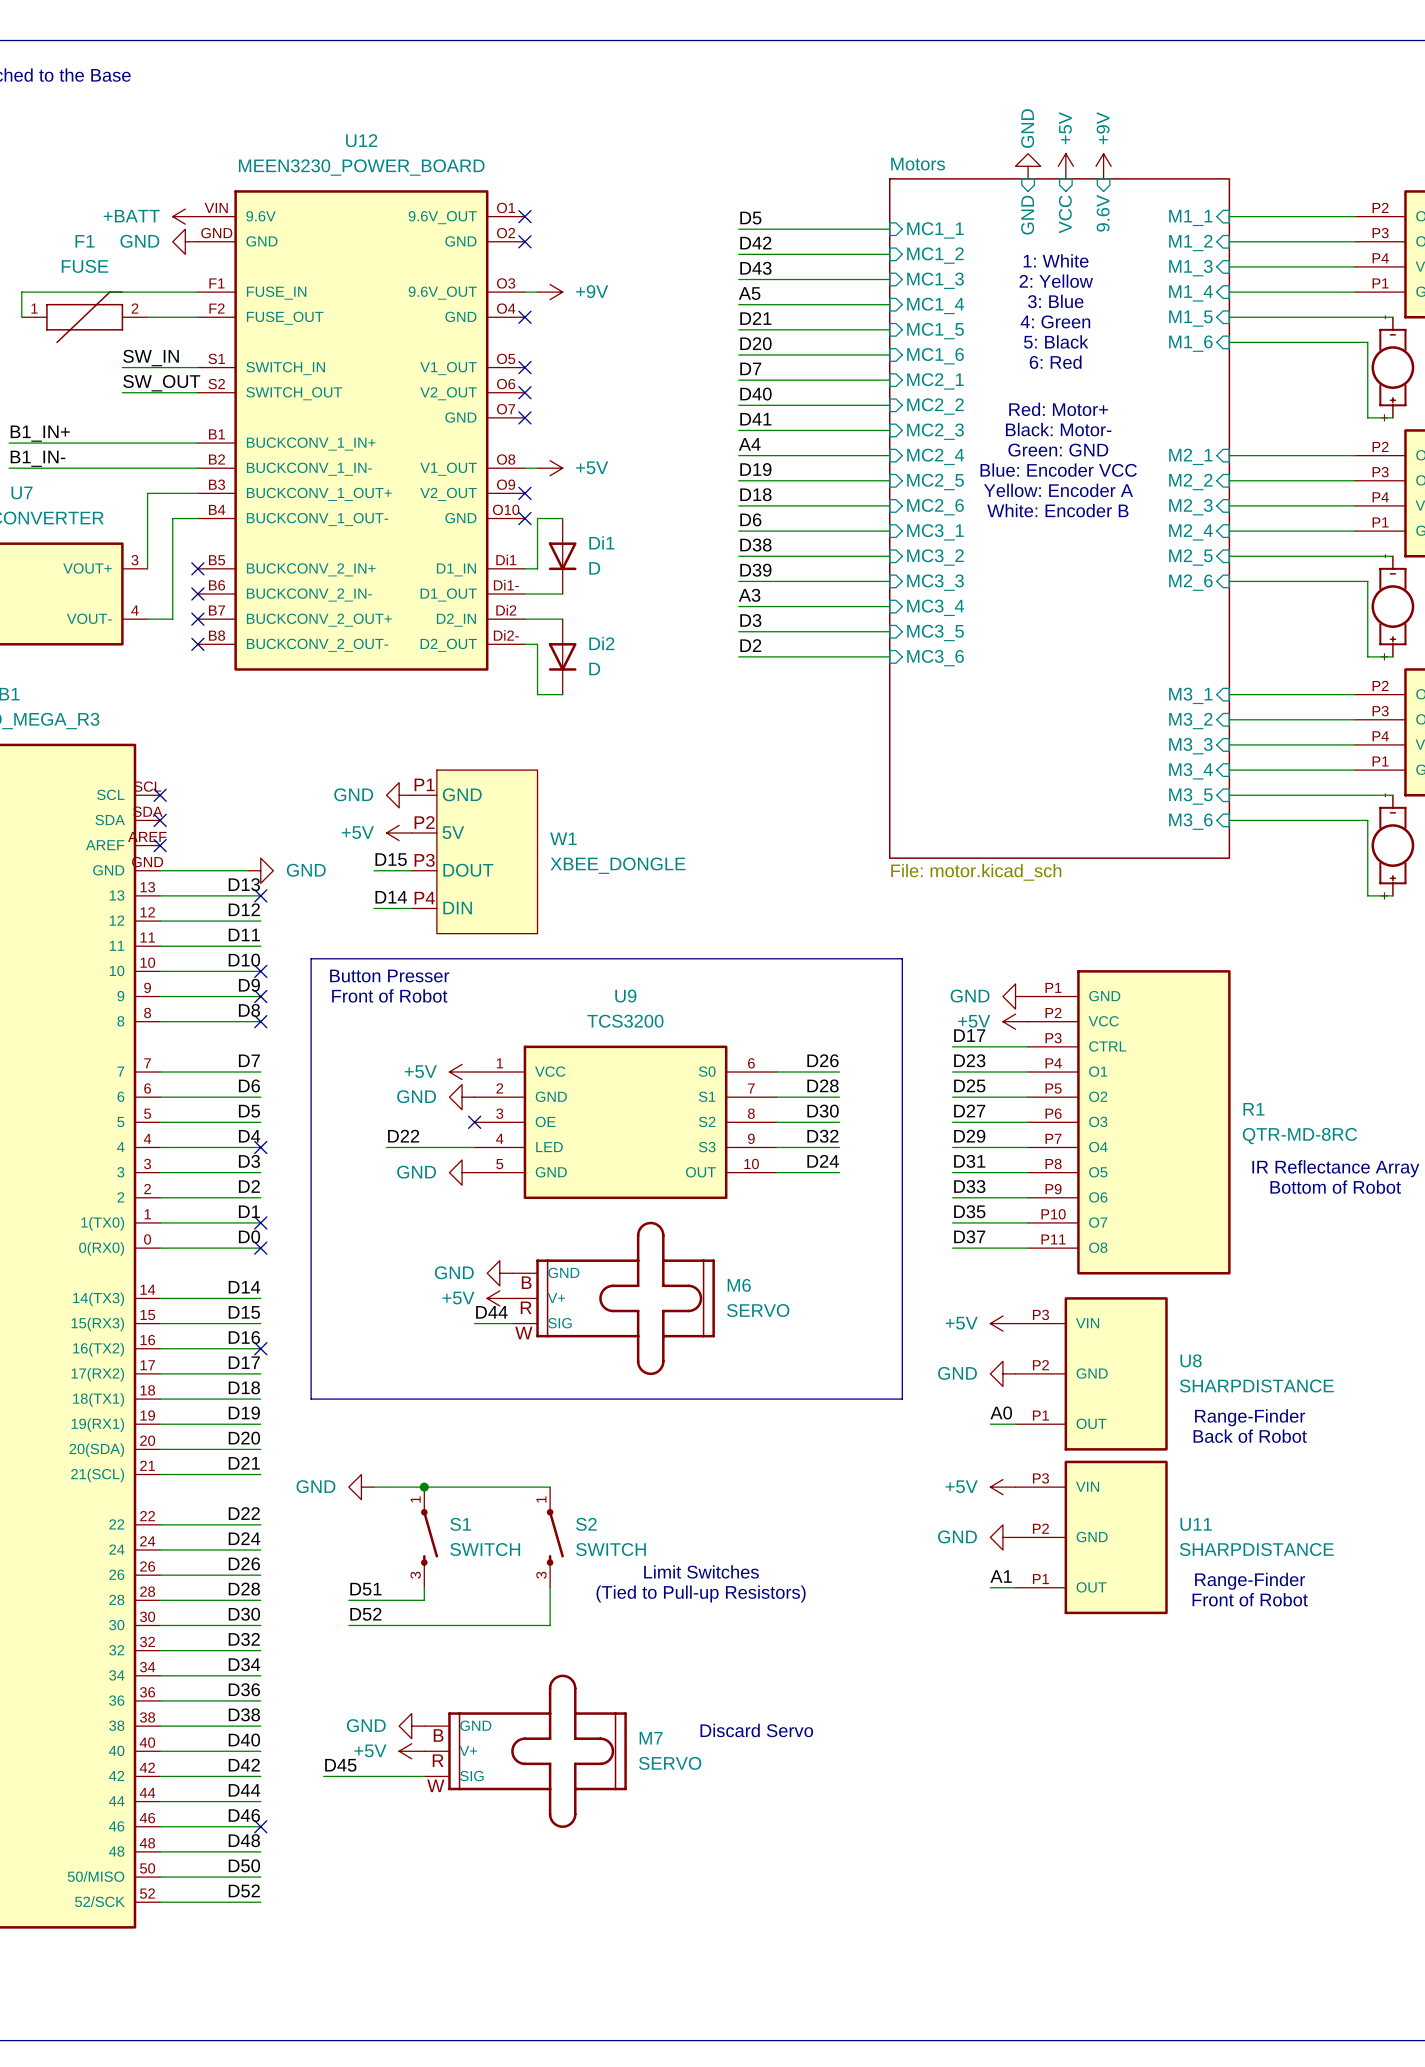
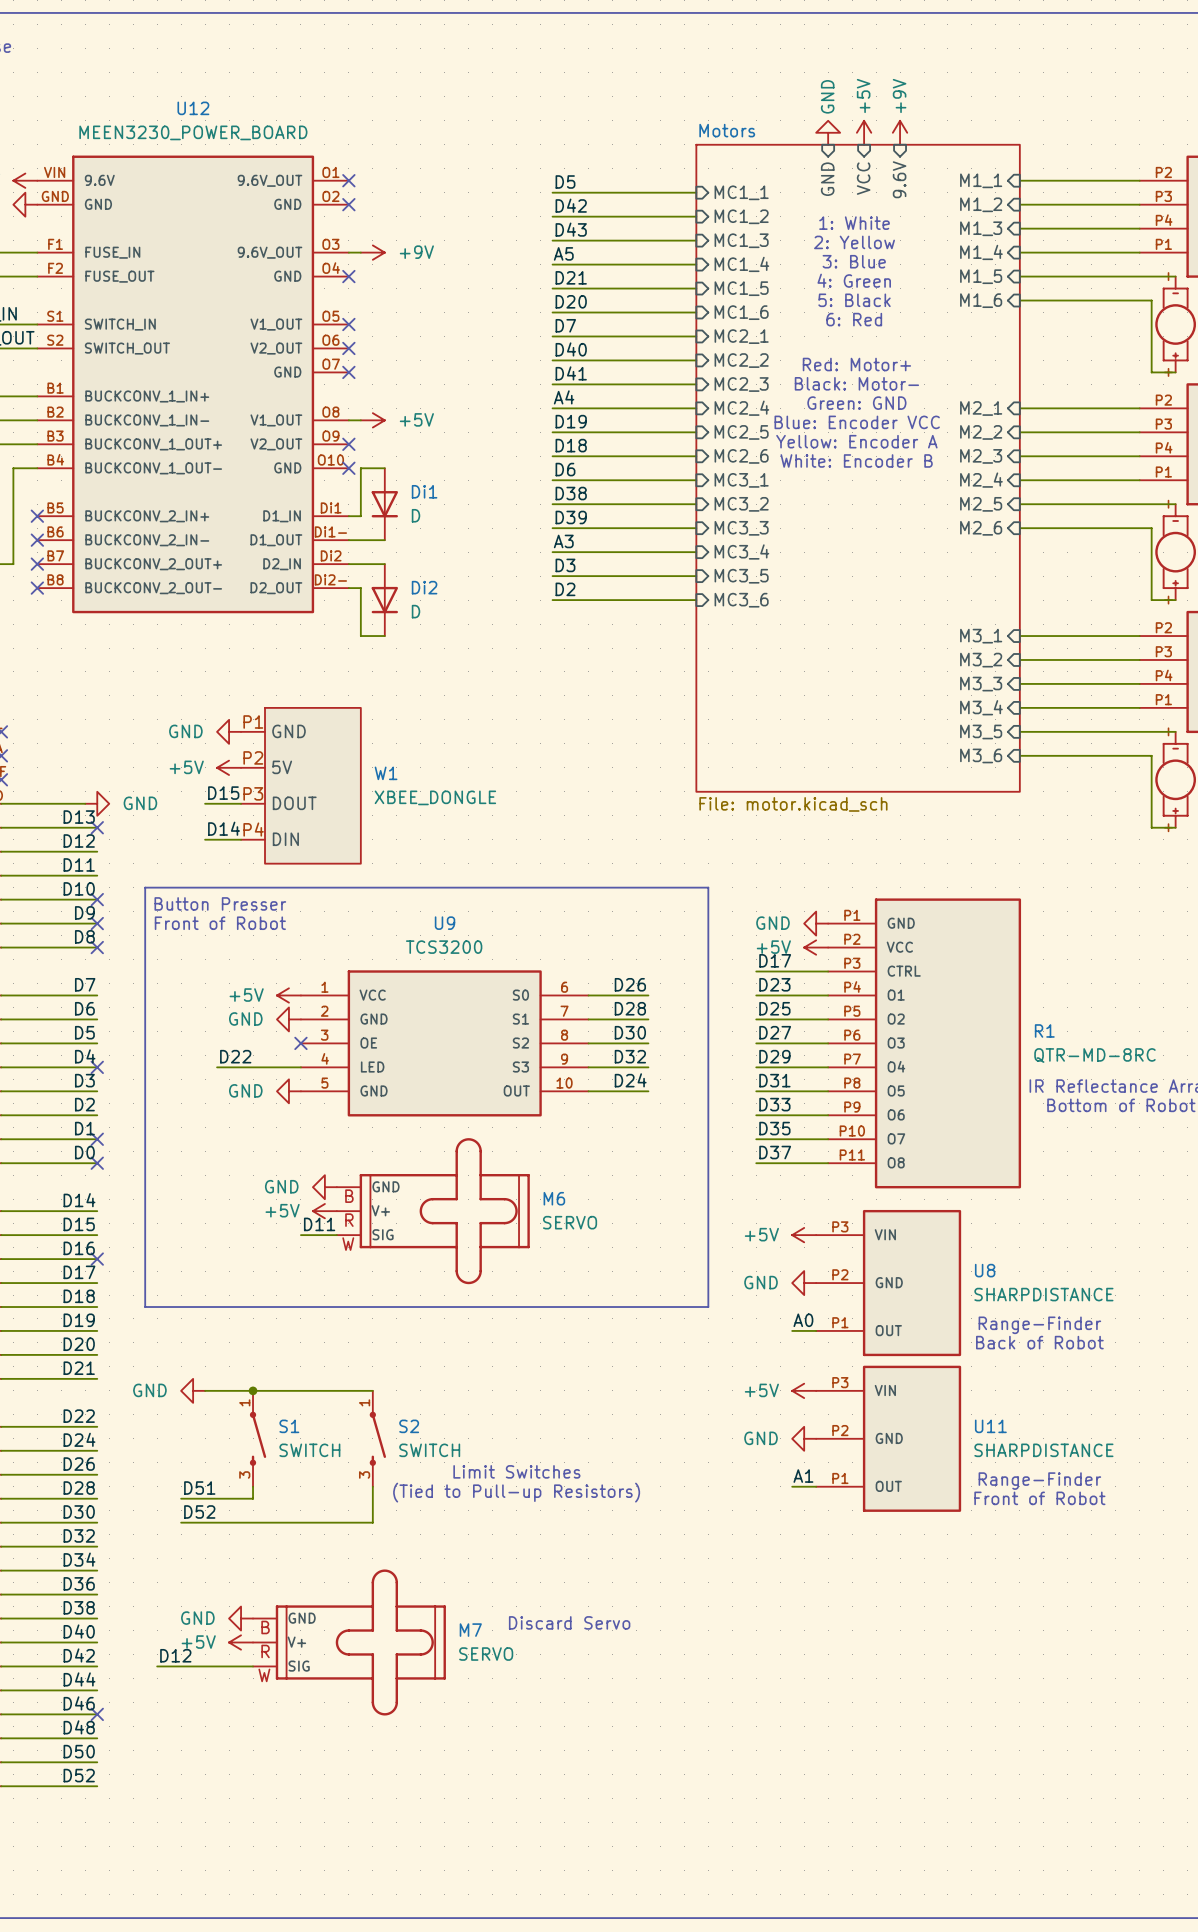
label: D44 (491, 1312) -> D11 (319, 1224)
label: D45 (340, 1765) -> D12 (175, 1655)

